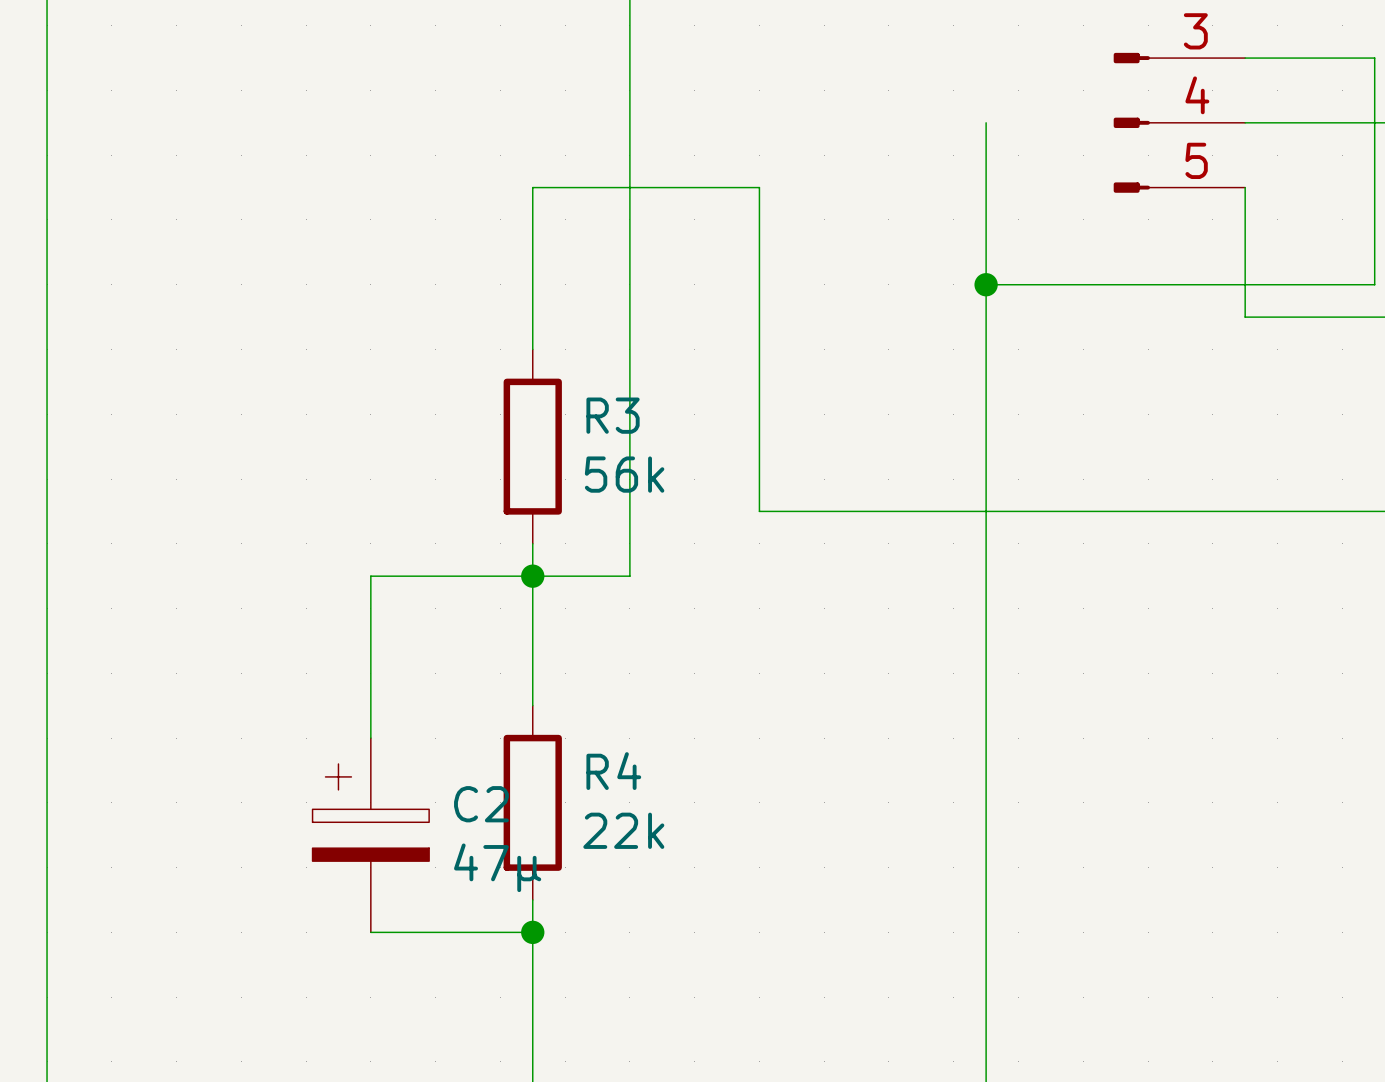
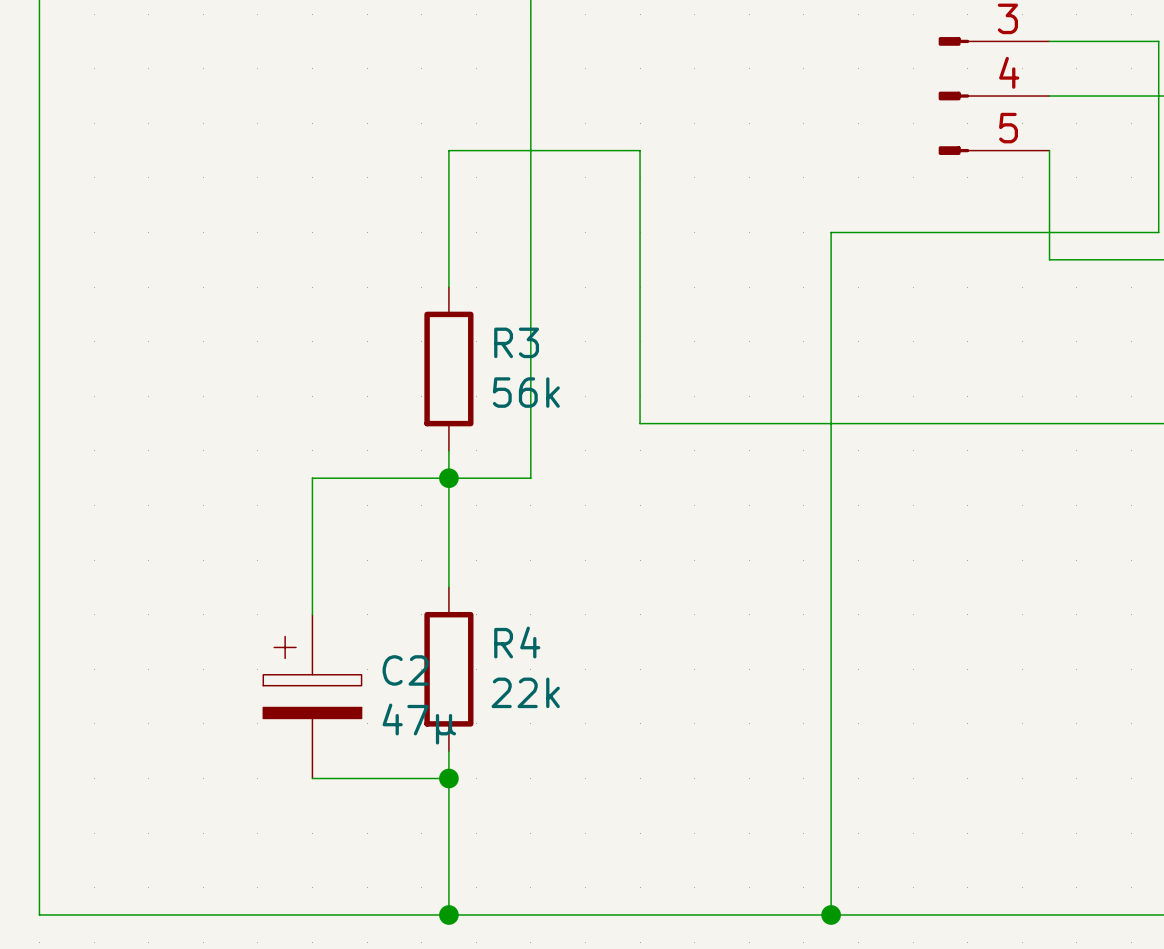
wire: (986, 122) (986, 284) -> none
junction: (986, 284) -> none

